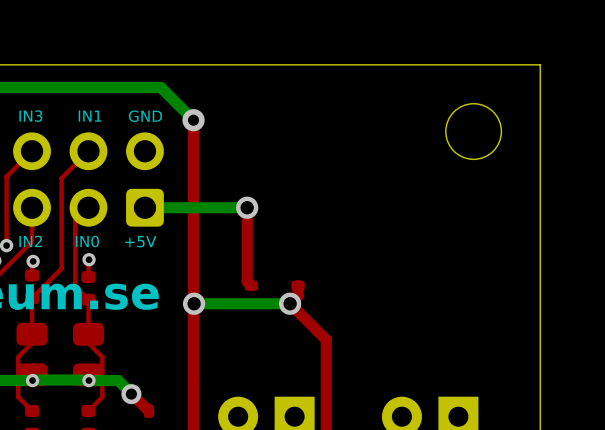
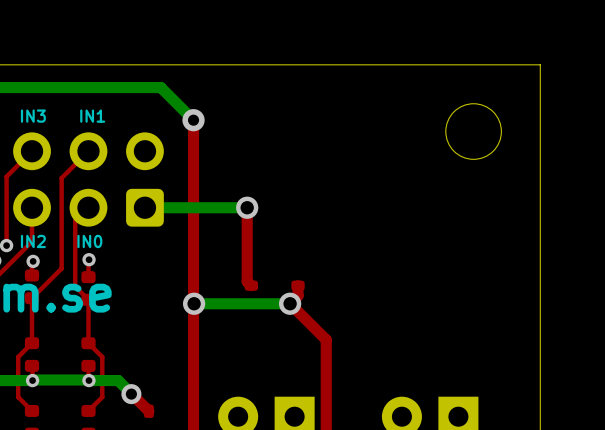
text: GND (145, 116) -> none
text: +5V (140, 241) -> none
part footprint: [16, 322, 48, 387] -> [24, 337, 40, 372]
part footprint: [72, 322, 105, 387] -> [81, 337, 96, 372]

